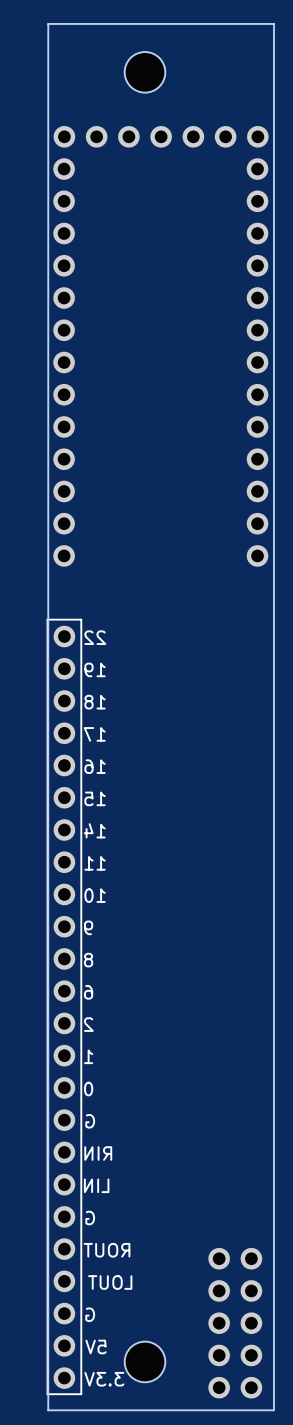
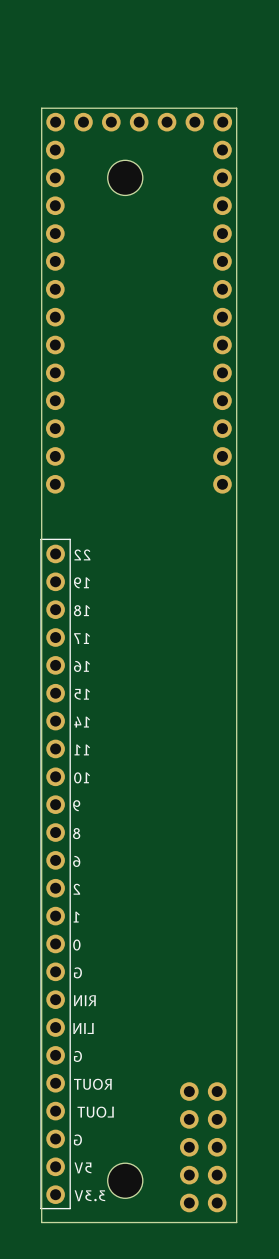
part position: (145, 72) -> (125, 177)
board edge: (273, 120) (273, 23) (48, 23) (48, 120) -> (236, 108) (41, 108)

